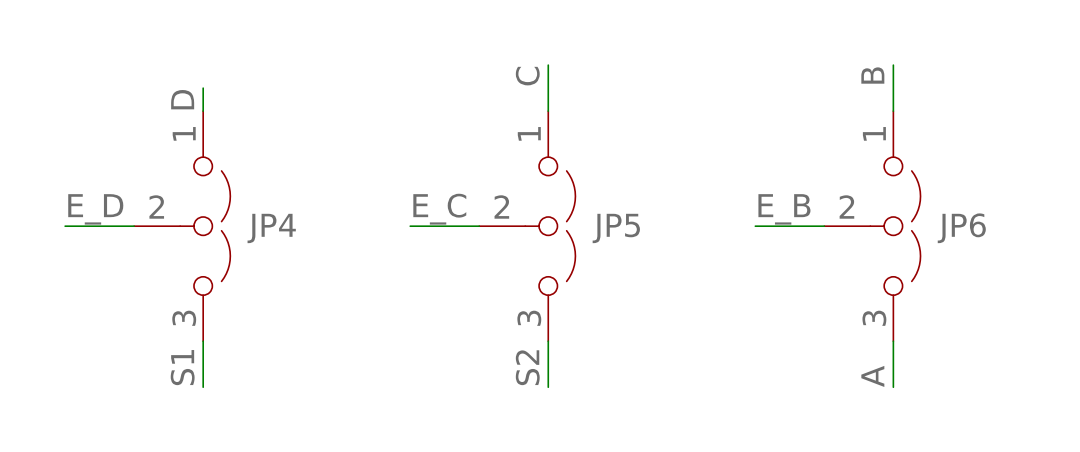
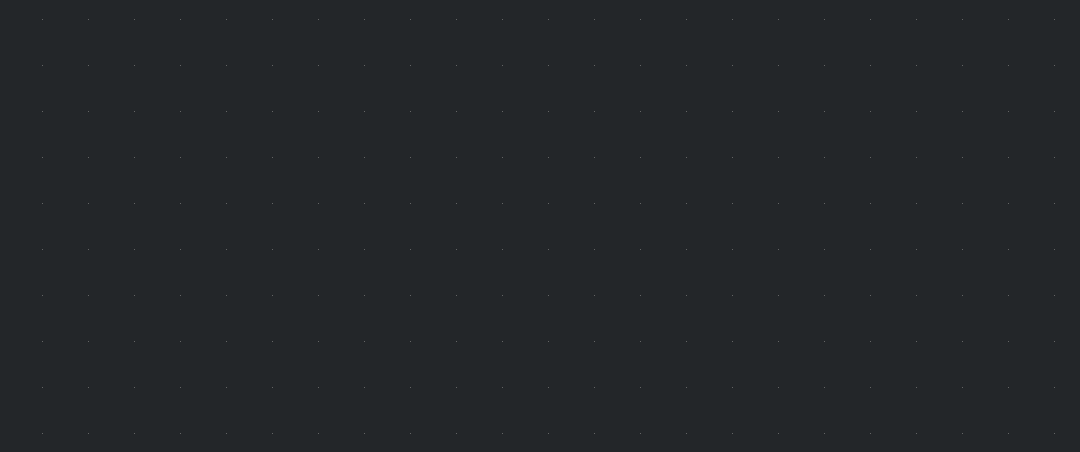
wire: (548, 65) (548, 111) -> none
wire: (893, 65) (893, 111) -> none
label: B (872, 75) -> none
label: C (527, 76) -> none
wire: (203, 88) (203, 111) -> none
label: D (182, 99) -> none
label: E_D (95, 209) -> none
label: E_C (439, 209) -> none
label: E_B (784, 209) -> none
wire: (65, 226) (134, 226) -> none
JP4: (182, 226) -> none
wire: (410, 226) (479, 226) -> none
JP5: (527, 226) -> none
wire: (755, 226) (824, 226) -> none
JP6: (872, 226) -> none
wire: (203, 341) (203, 387) -> none
wire: (548, 341) (548, 387) -> none
wire: (893, 341) (893, 387) -> none
label: S1 (182, 367) -> none
label: S2 (527, 367) -> none
label: A (872, 376) -> none

